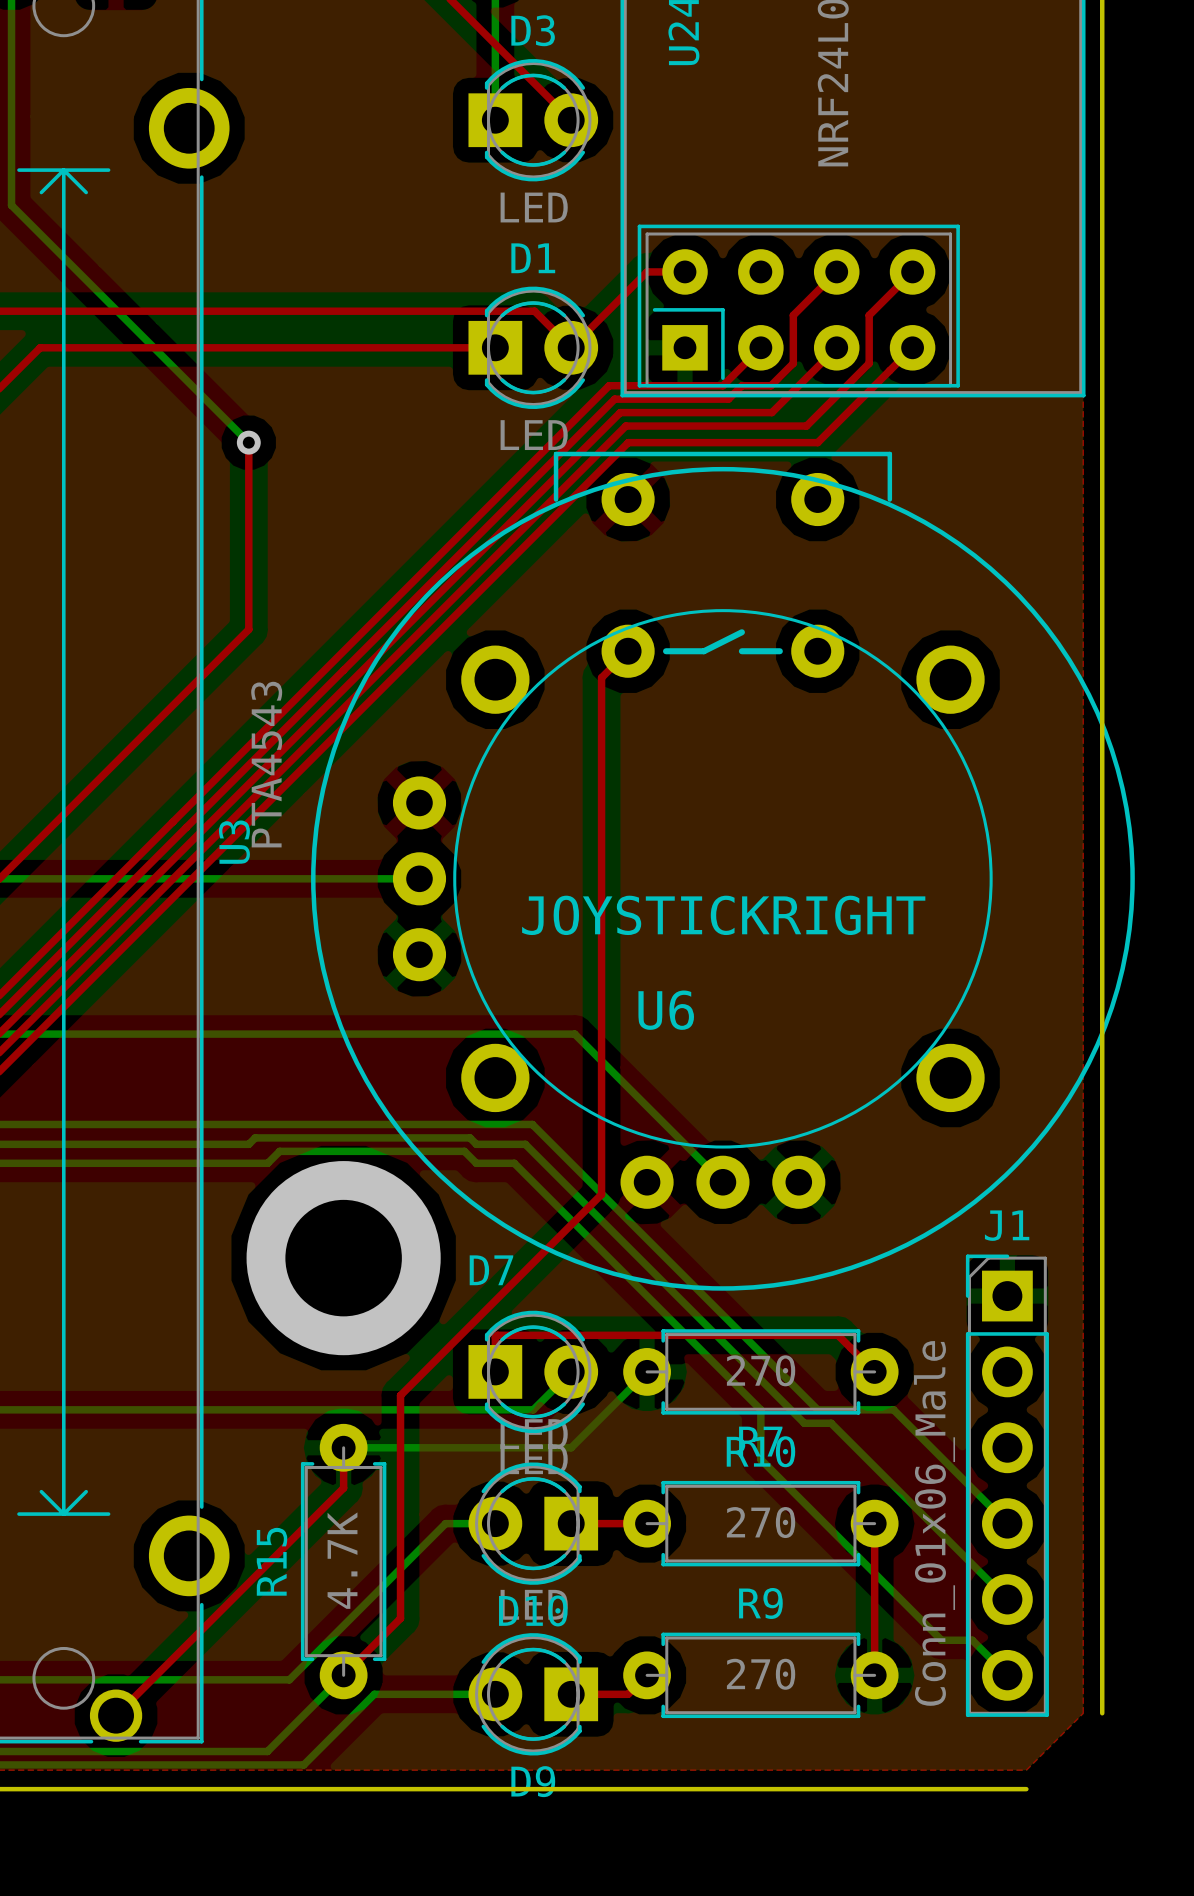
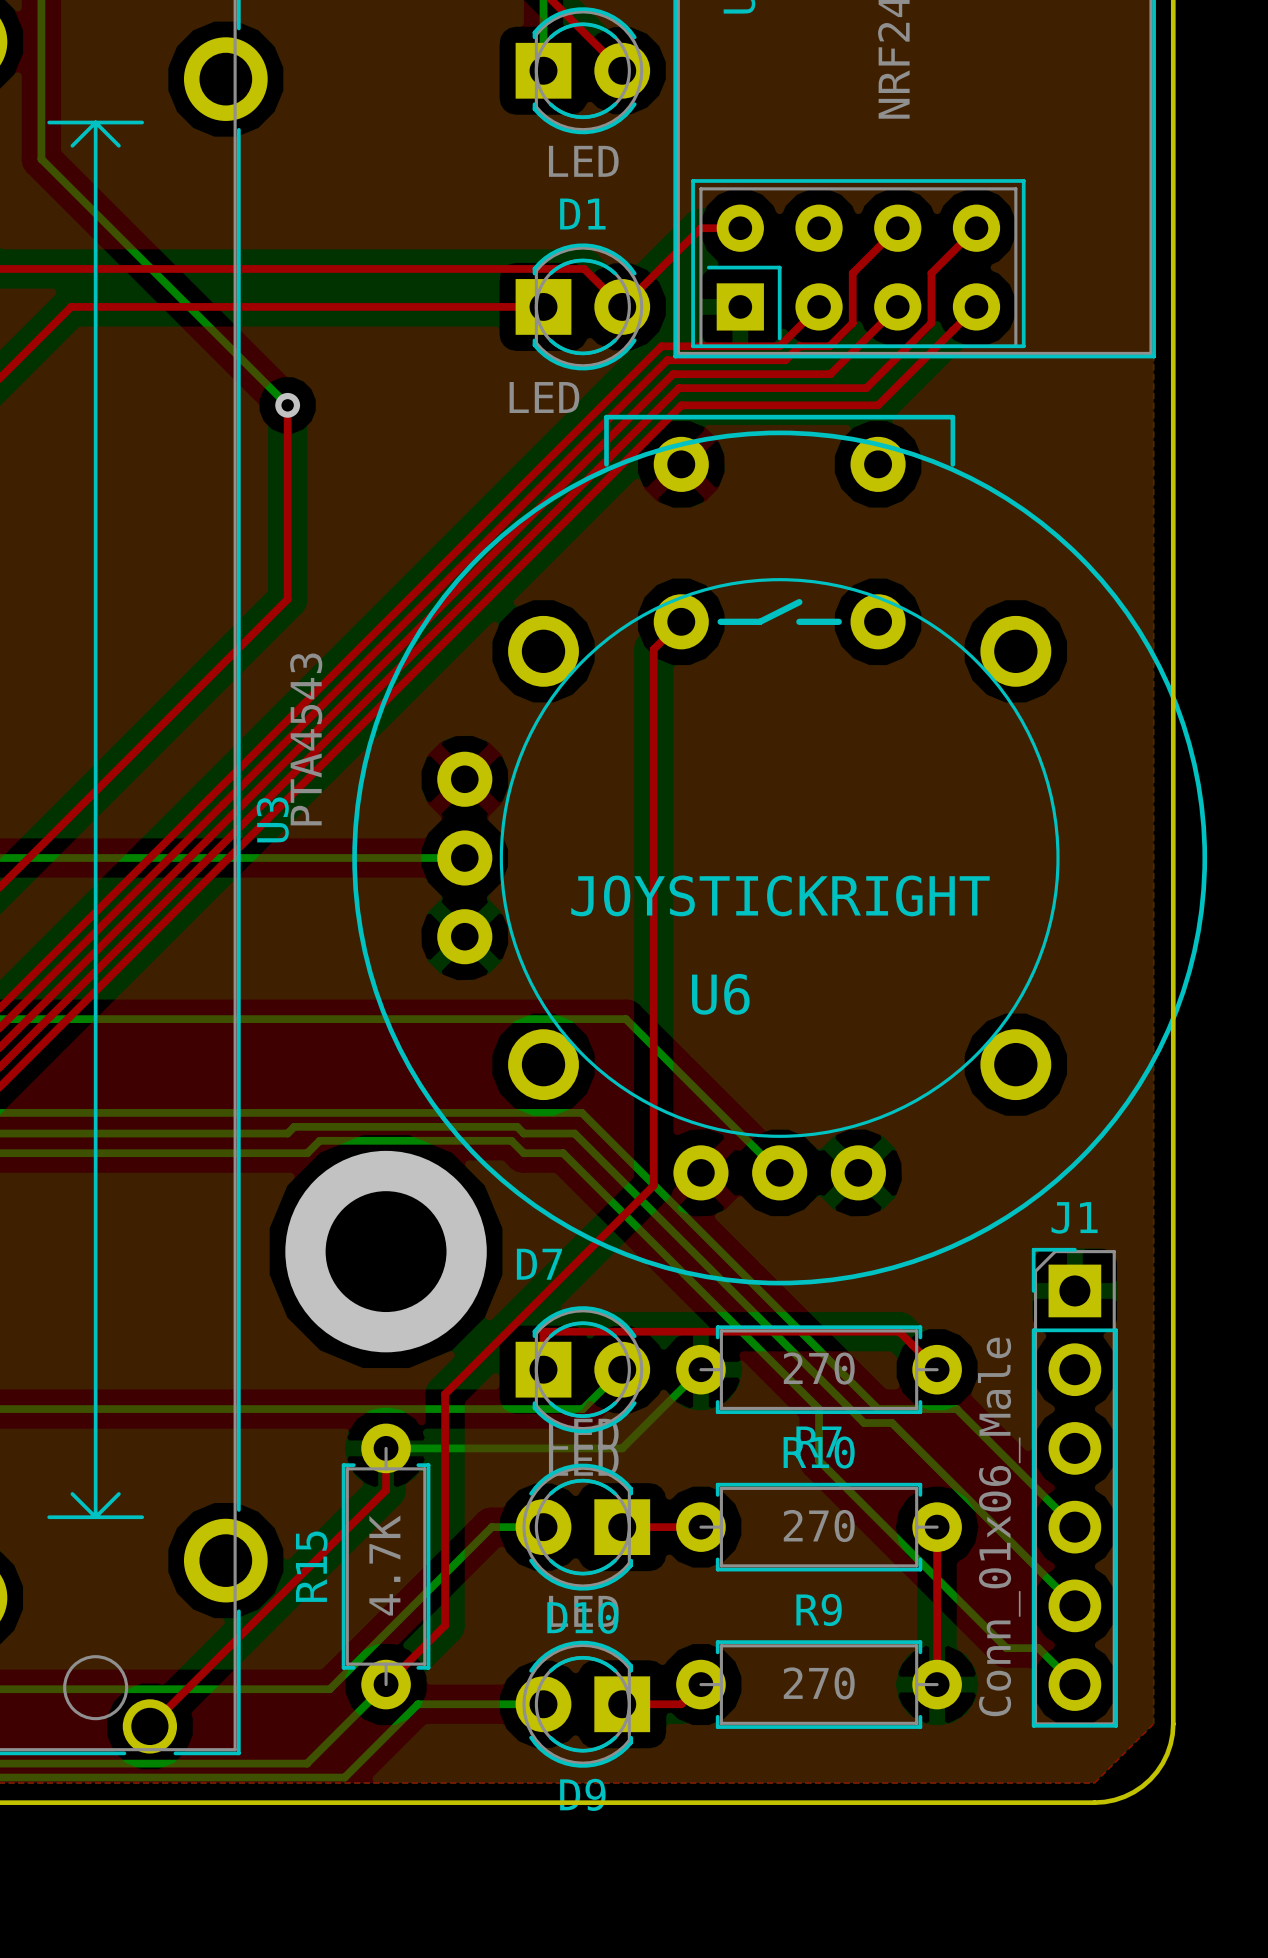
D1 value position: LED (534, 435) -> LED (544, 397)
board edge: none -> (1173, 1723) (1167, 1754) (1150, 1779) (1124, 1796) (1094, 1802)

